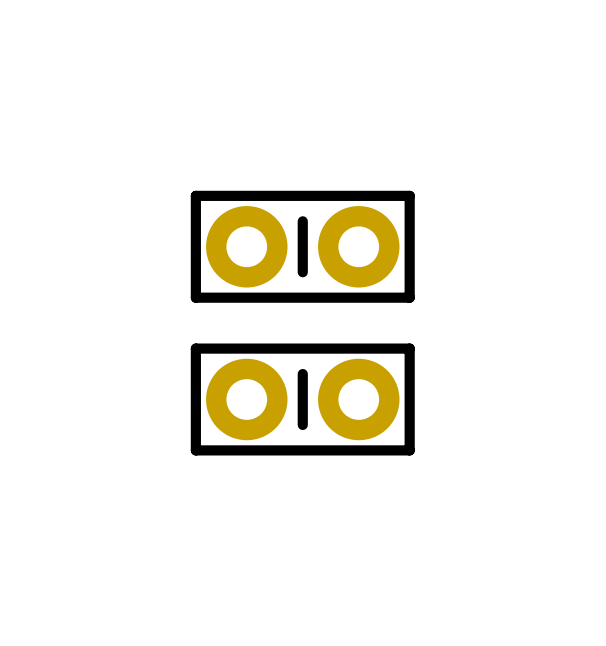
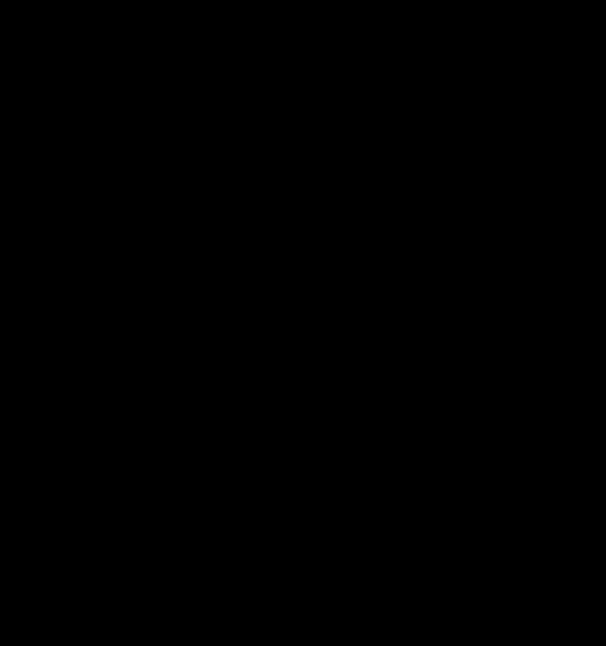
part: (302, 246) -> none
part: (302, 399) -> none

